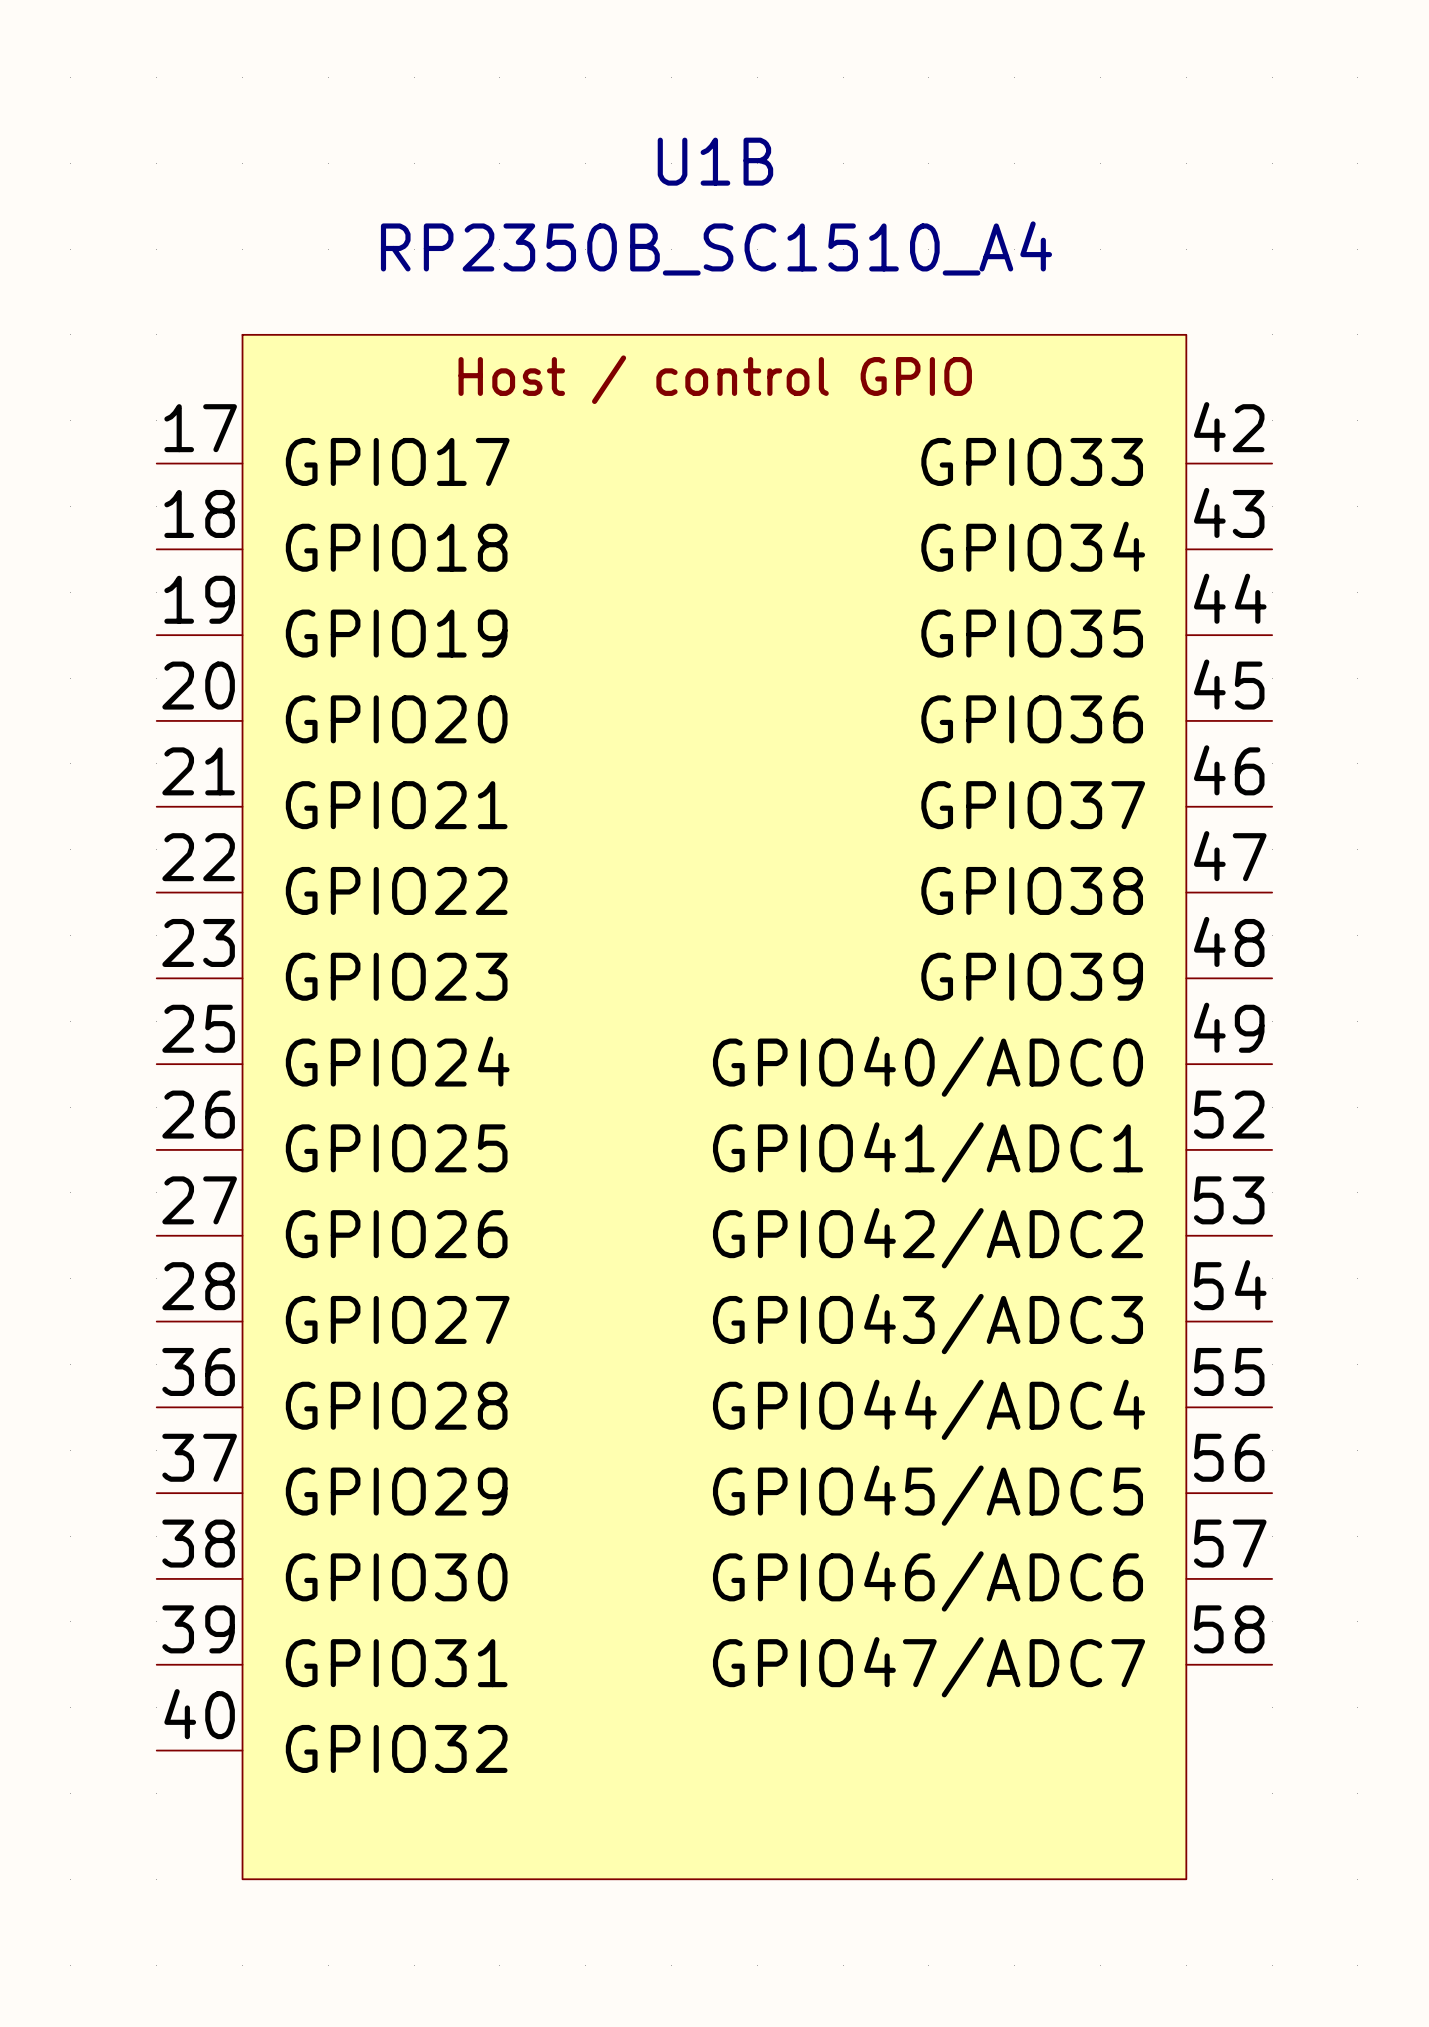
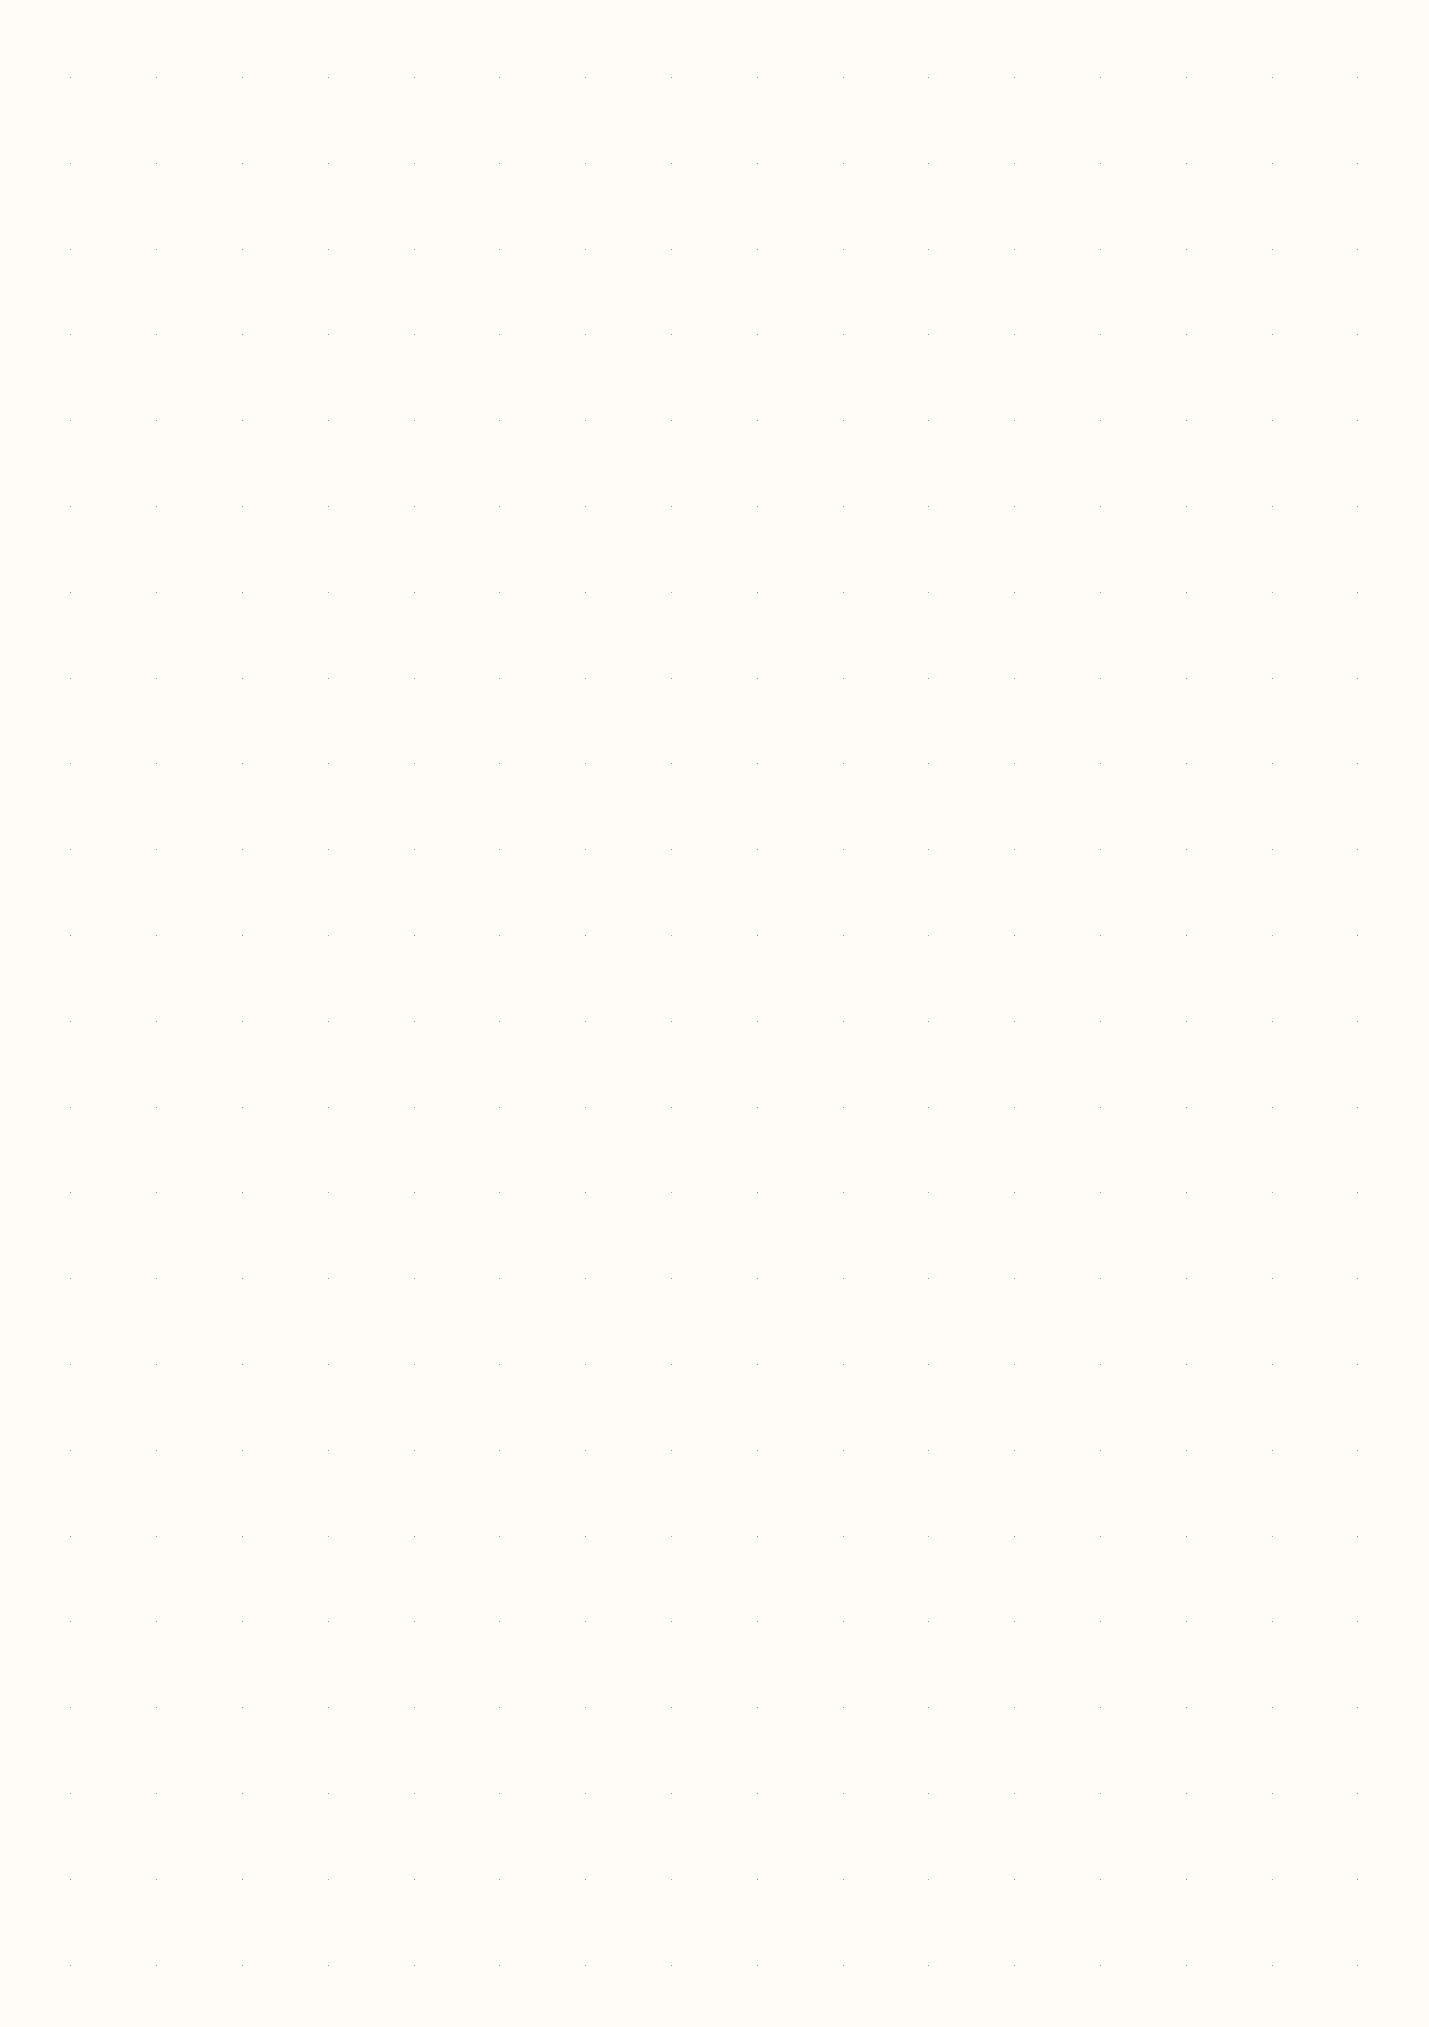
U1B: RP2350B_SC1510_A4 (714, 1107) -> none

